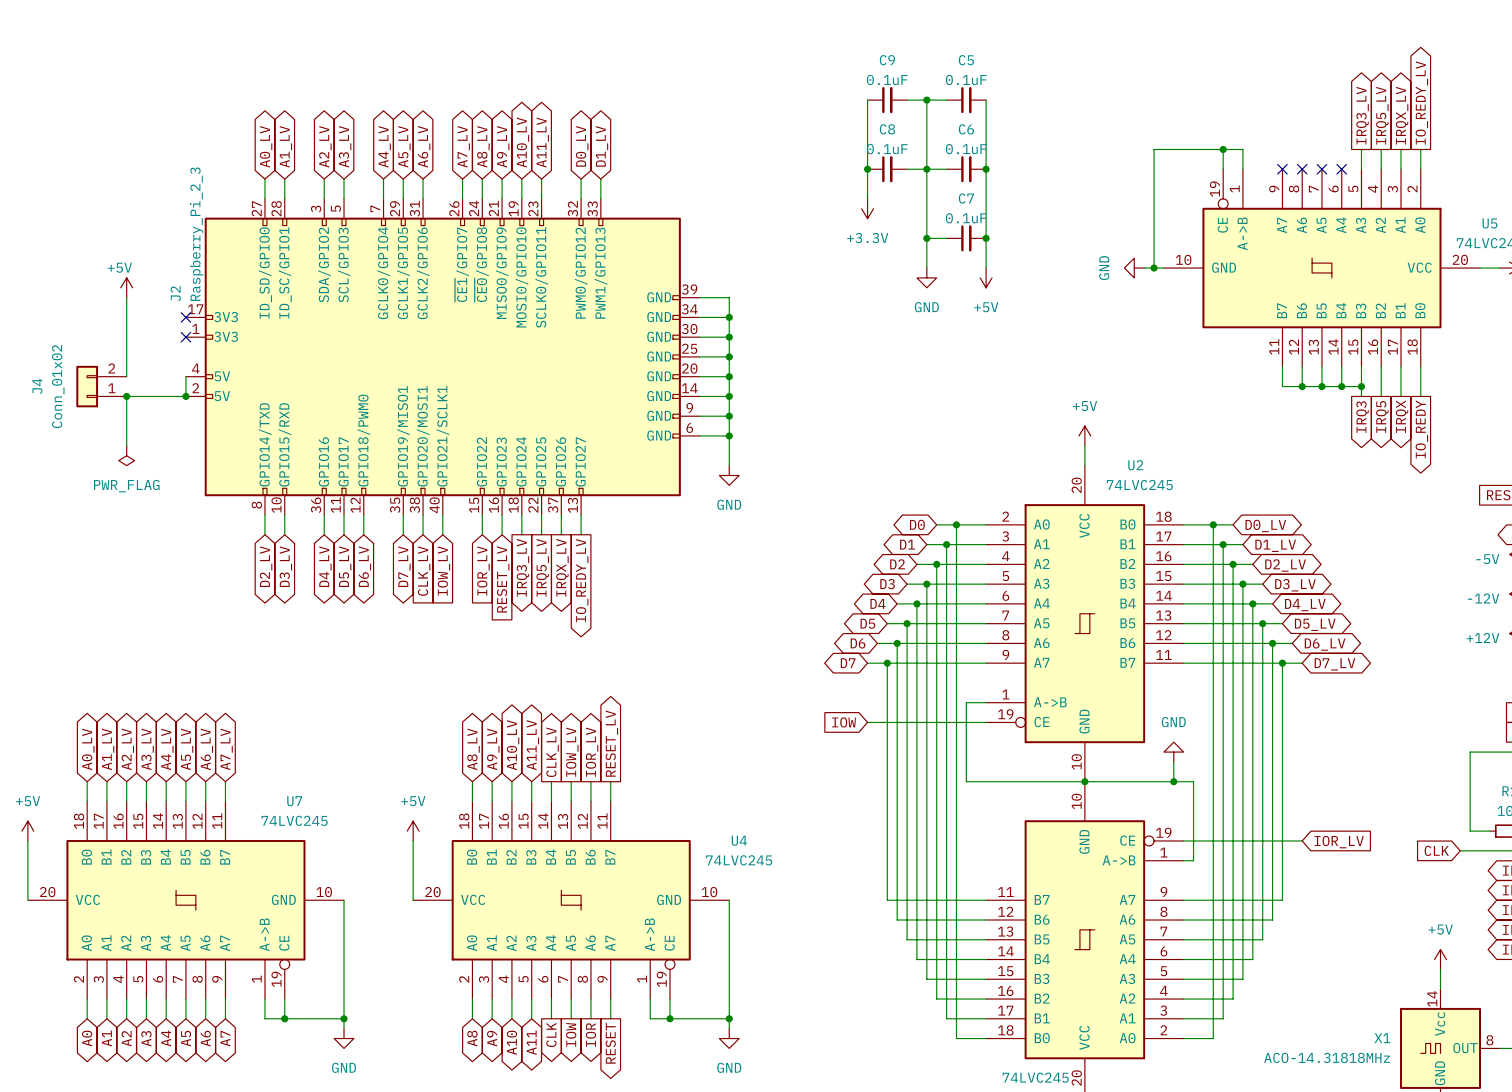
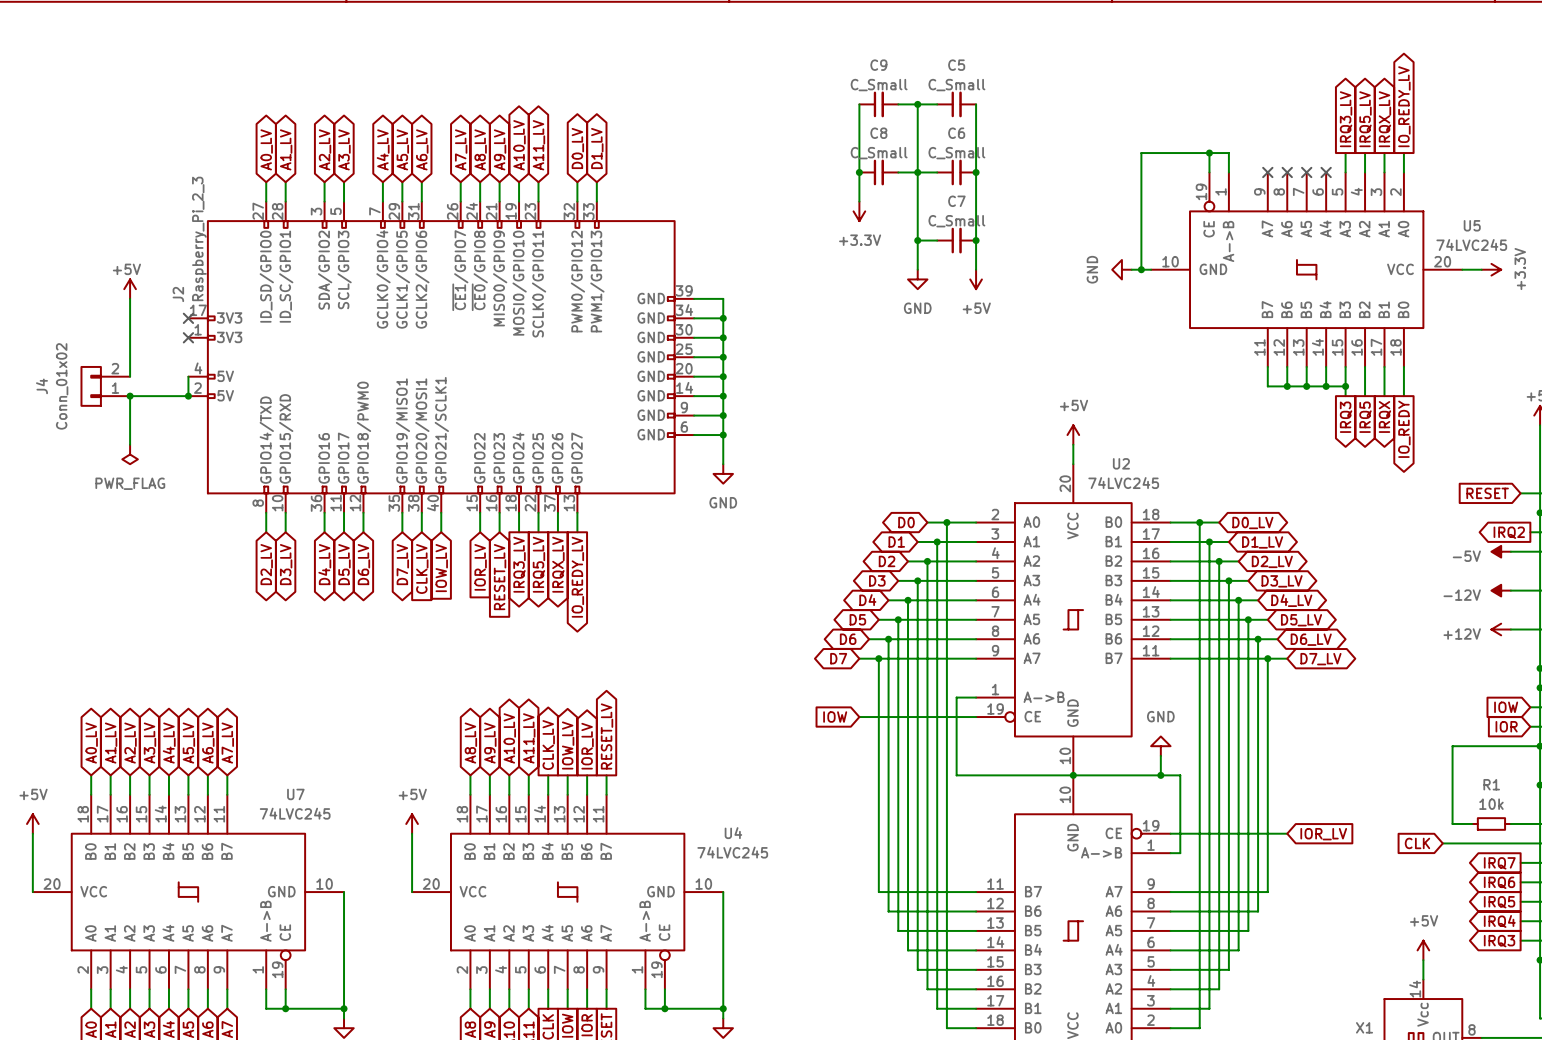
C9 value: 0.1uF (887, 79) -> C_Small (879, 85)
C5 value: 0.1uF (966, 79) -> C_Small (956, 85)
C8 value: 0.1uF (887, 149) -> C_Small (879, 153)
C6 value: 0.1uF (966, 149) -> C_Small (956, 153)
C7 value: 0.1uF (966, 218) -> C_Small (956, 221)

